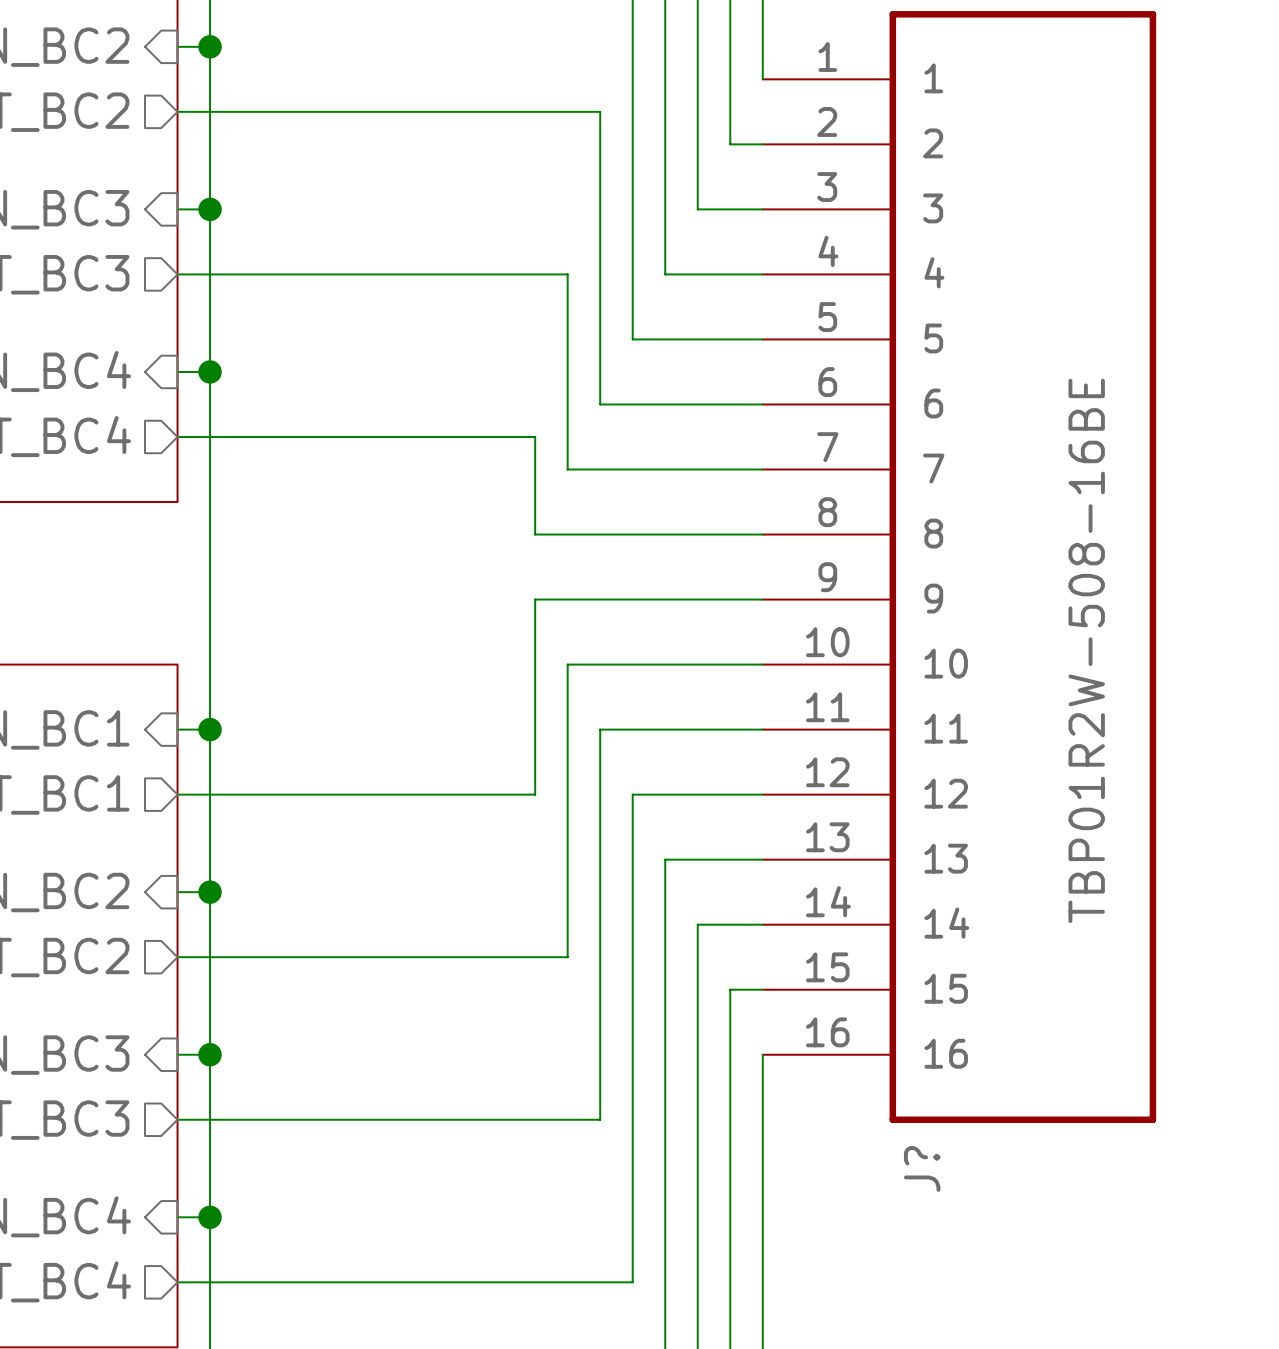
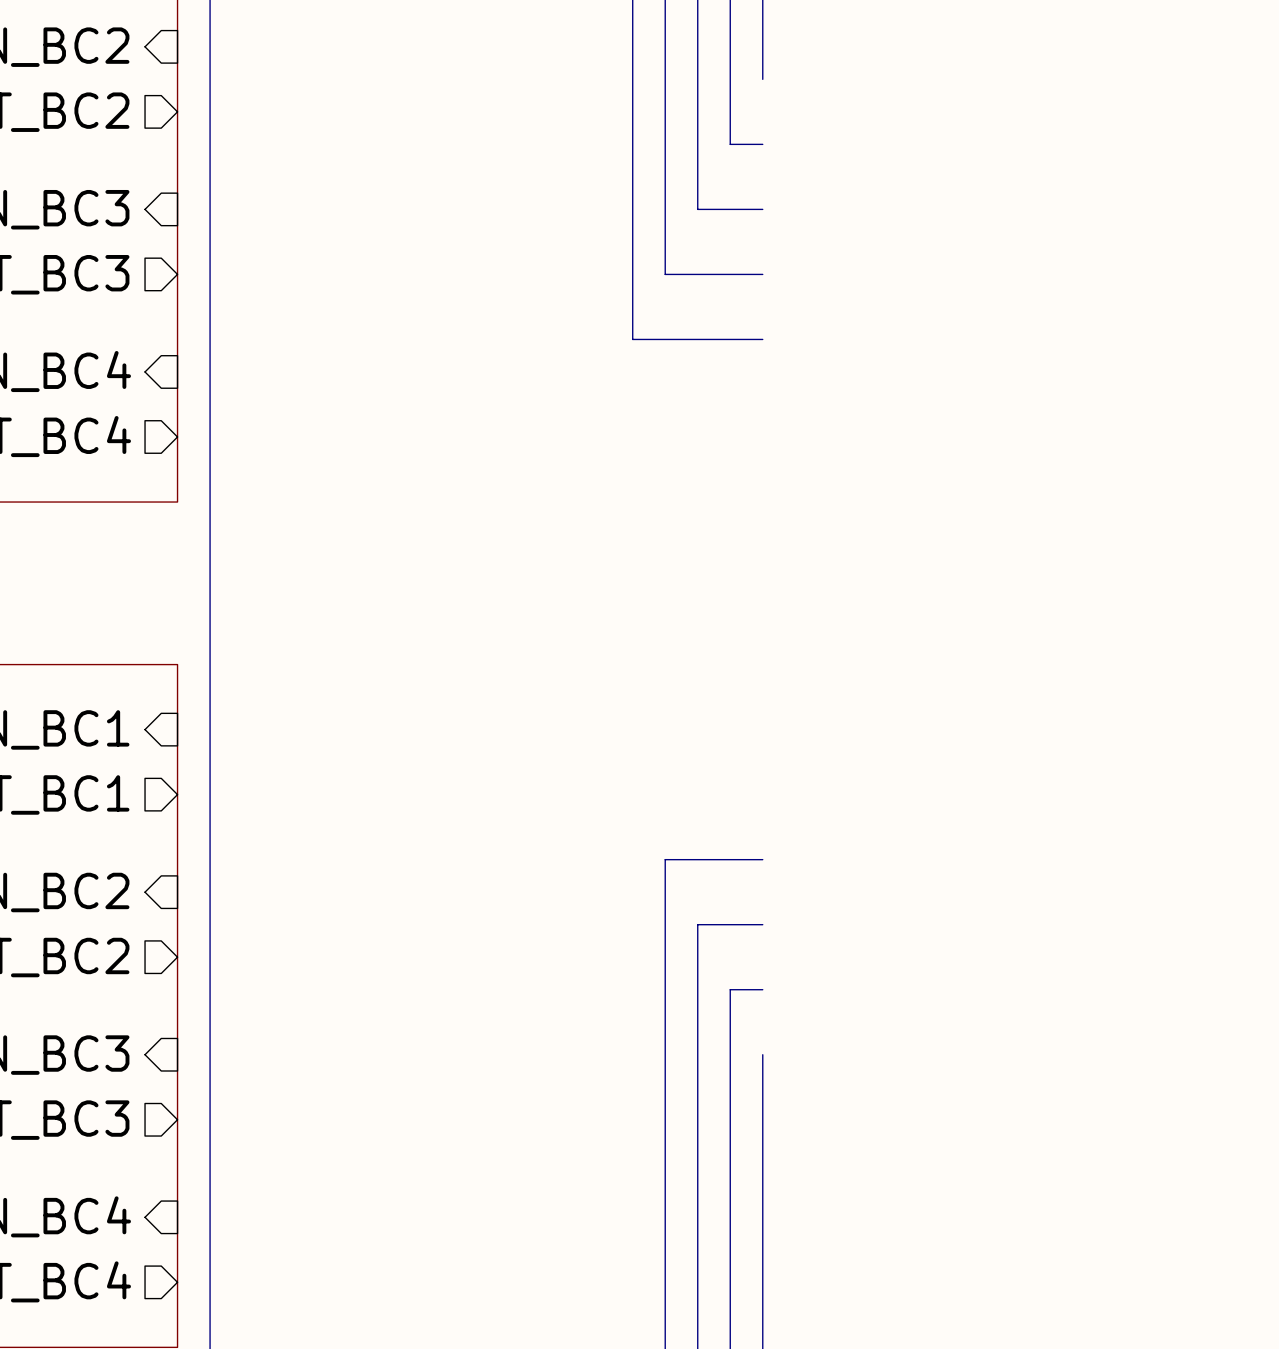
wire: (177, 46) (210, 46) -> none
junction: (210, 46) -> none
wire: (177, 111) (600, 111) (600, 404) (762, 404) -> none
wire: (177, 209) (210, 209) -> none
junction: (210, 209) -> none
wire: (177, 274) (567, 274) (567, 469) (762, 469) -> none
wire: (177, 371) (210, 371) -> none
junction: (210, 371) -> none
wire: (177, 436) (535, 436) (535, 534) (762, 534) -> none
J?: TBP01R2W-508-16BE (959, 567) -> none
wire: (762, 599) (535, 599) (535, 794) (177, 794) -> none
wire: (762, 664) (567, 664) (567, 957) (177, 957) -> none
wire: (177, 729) (210, 729) -> none
junction: (210, 729) -> none
wire: (762, 729) (600, 729) (600, 1119) (177, 1119) -> none
wire: (762, 794) (632, 794) (632, 1282) (177, 1282) -> none
wire: (177, 892) (210, 892) -> none
junction: (210, 892) -> none
wire: (177, 1054) (210, 1054) -> none
junction: (210, 1054) -> none
wire: (177, 1217) (210, 1217) -> none
junction: (210, 1217) -> none

